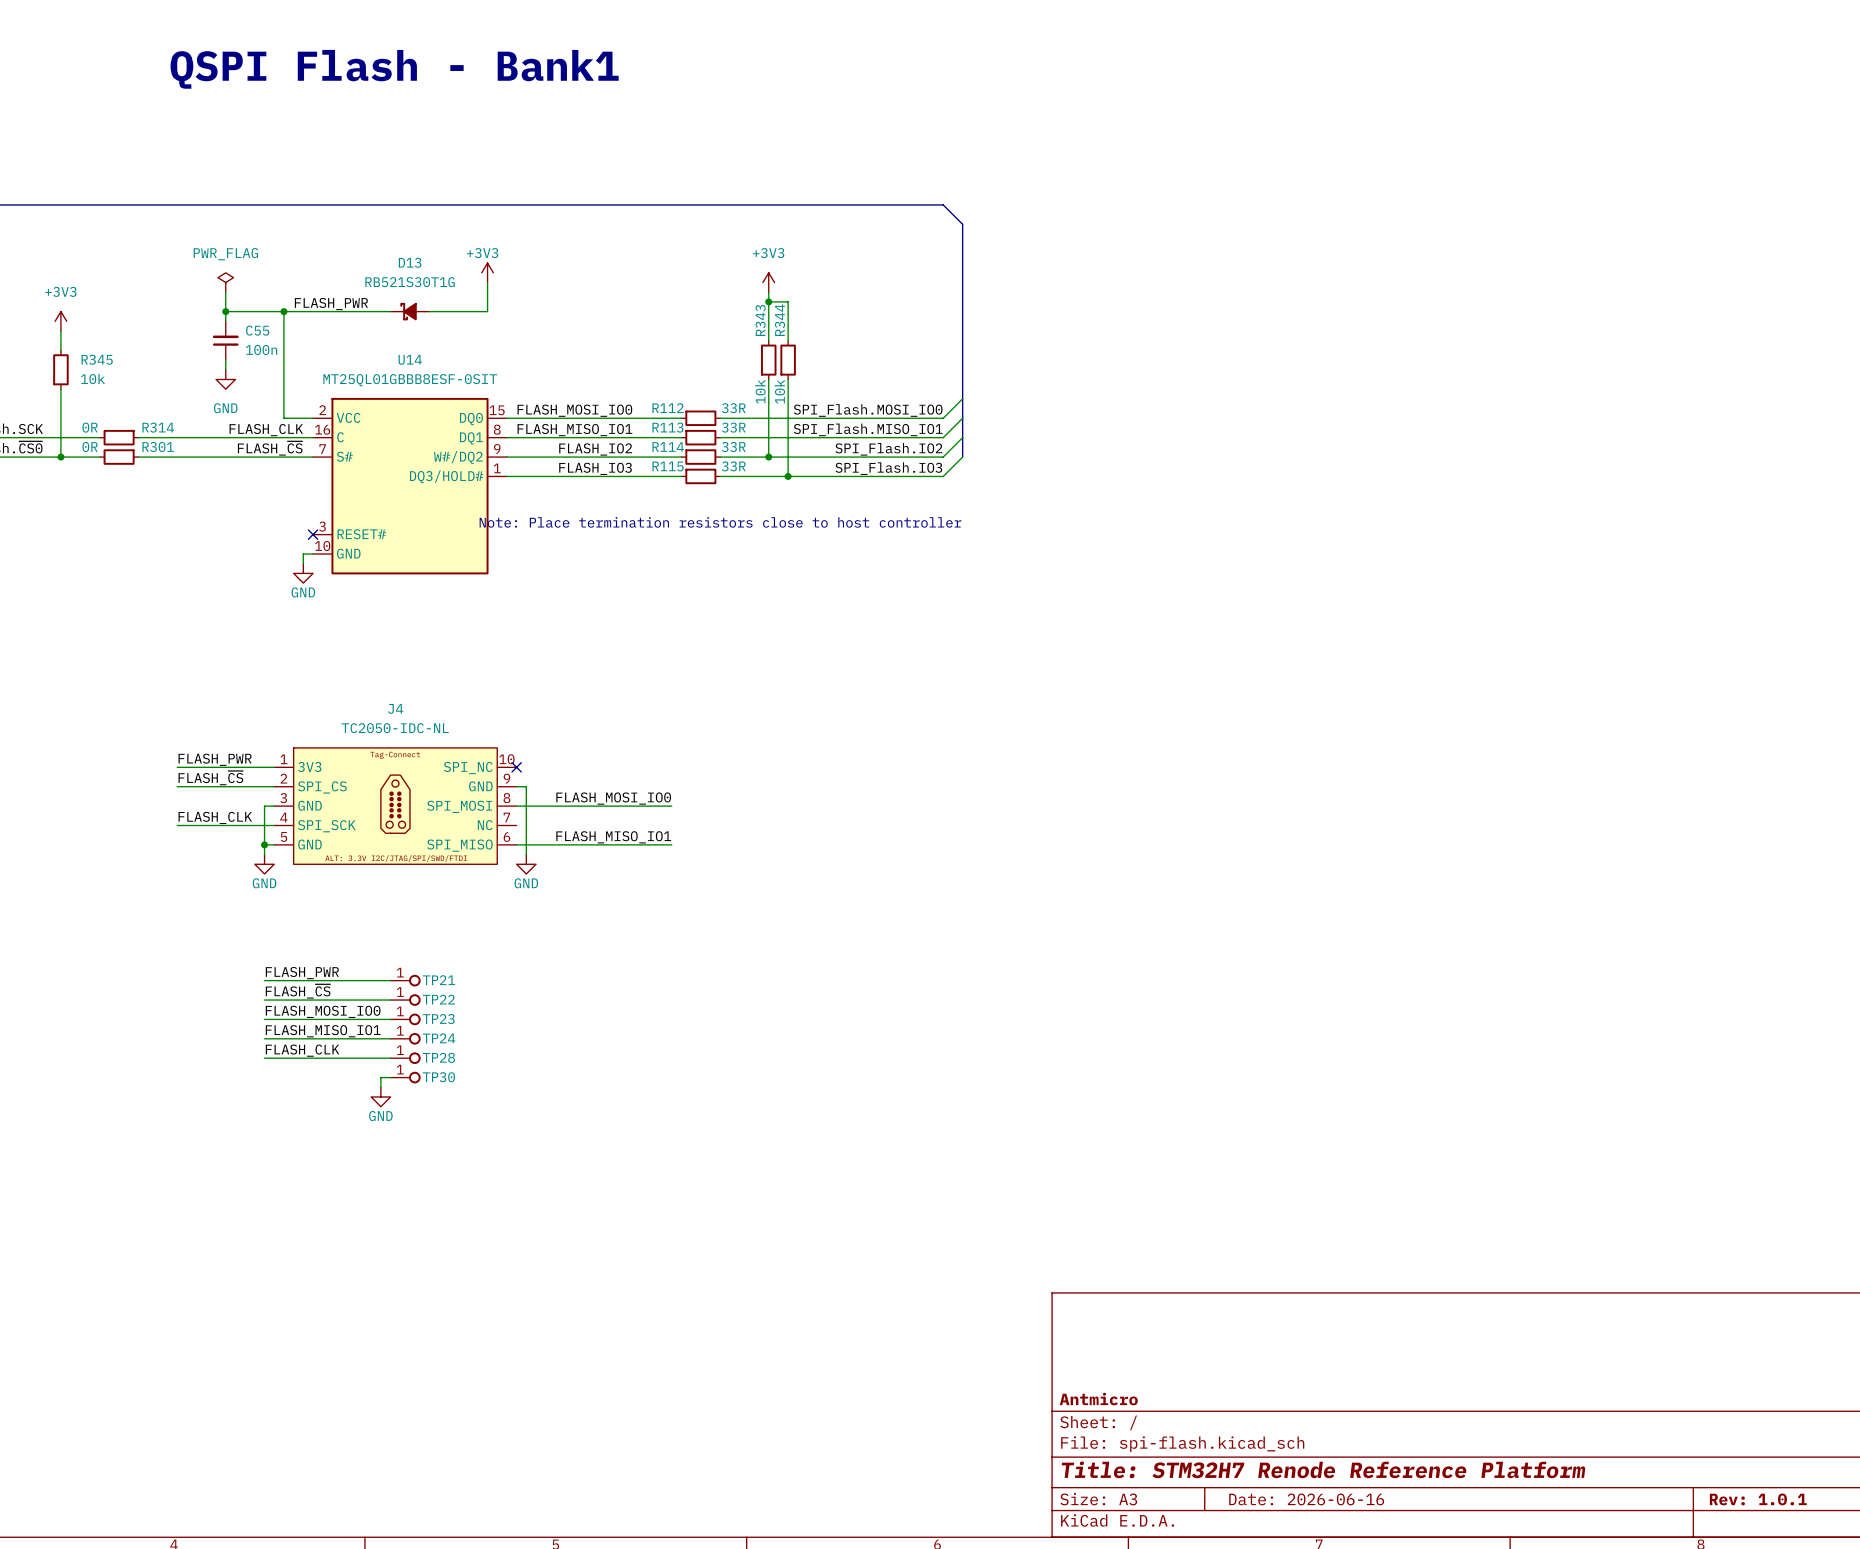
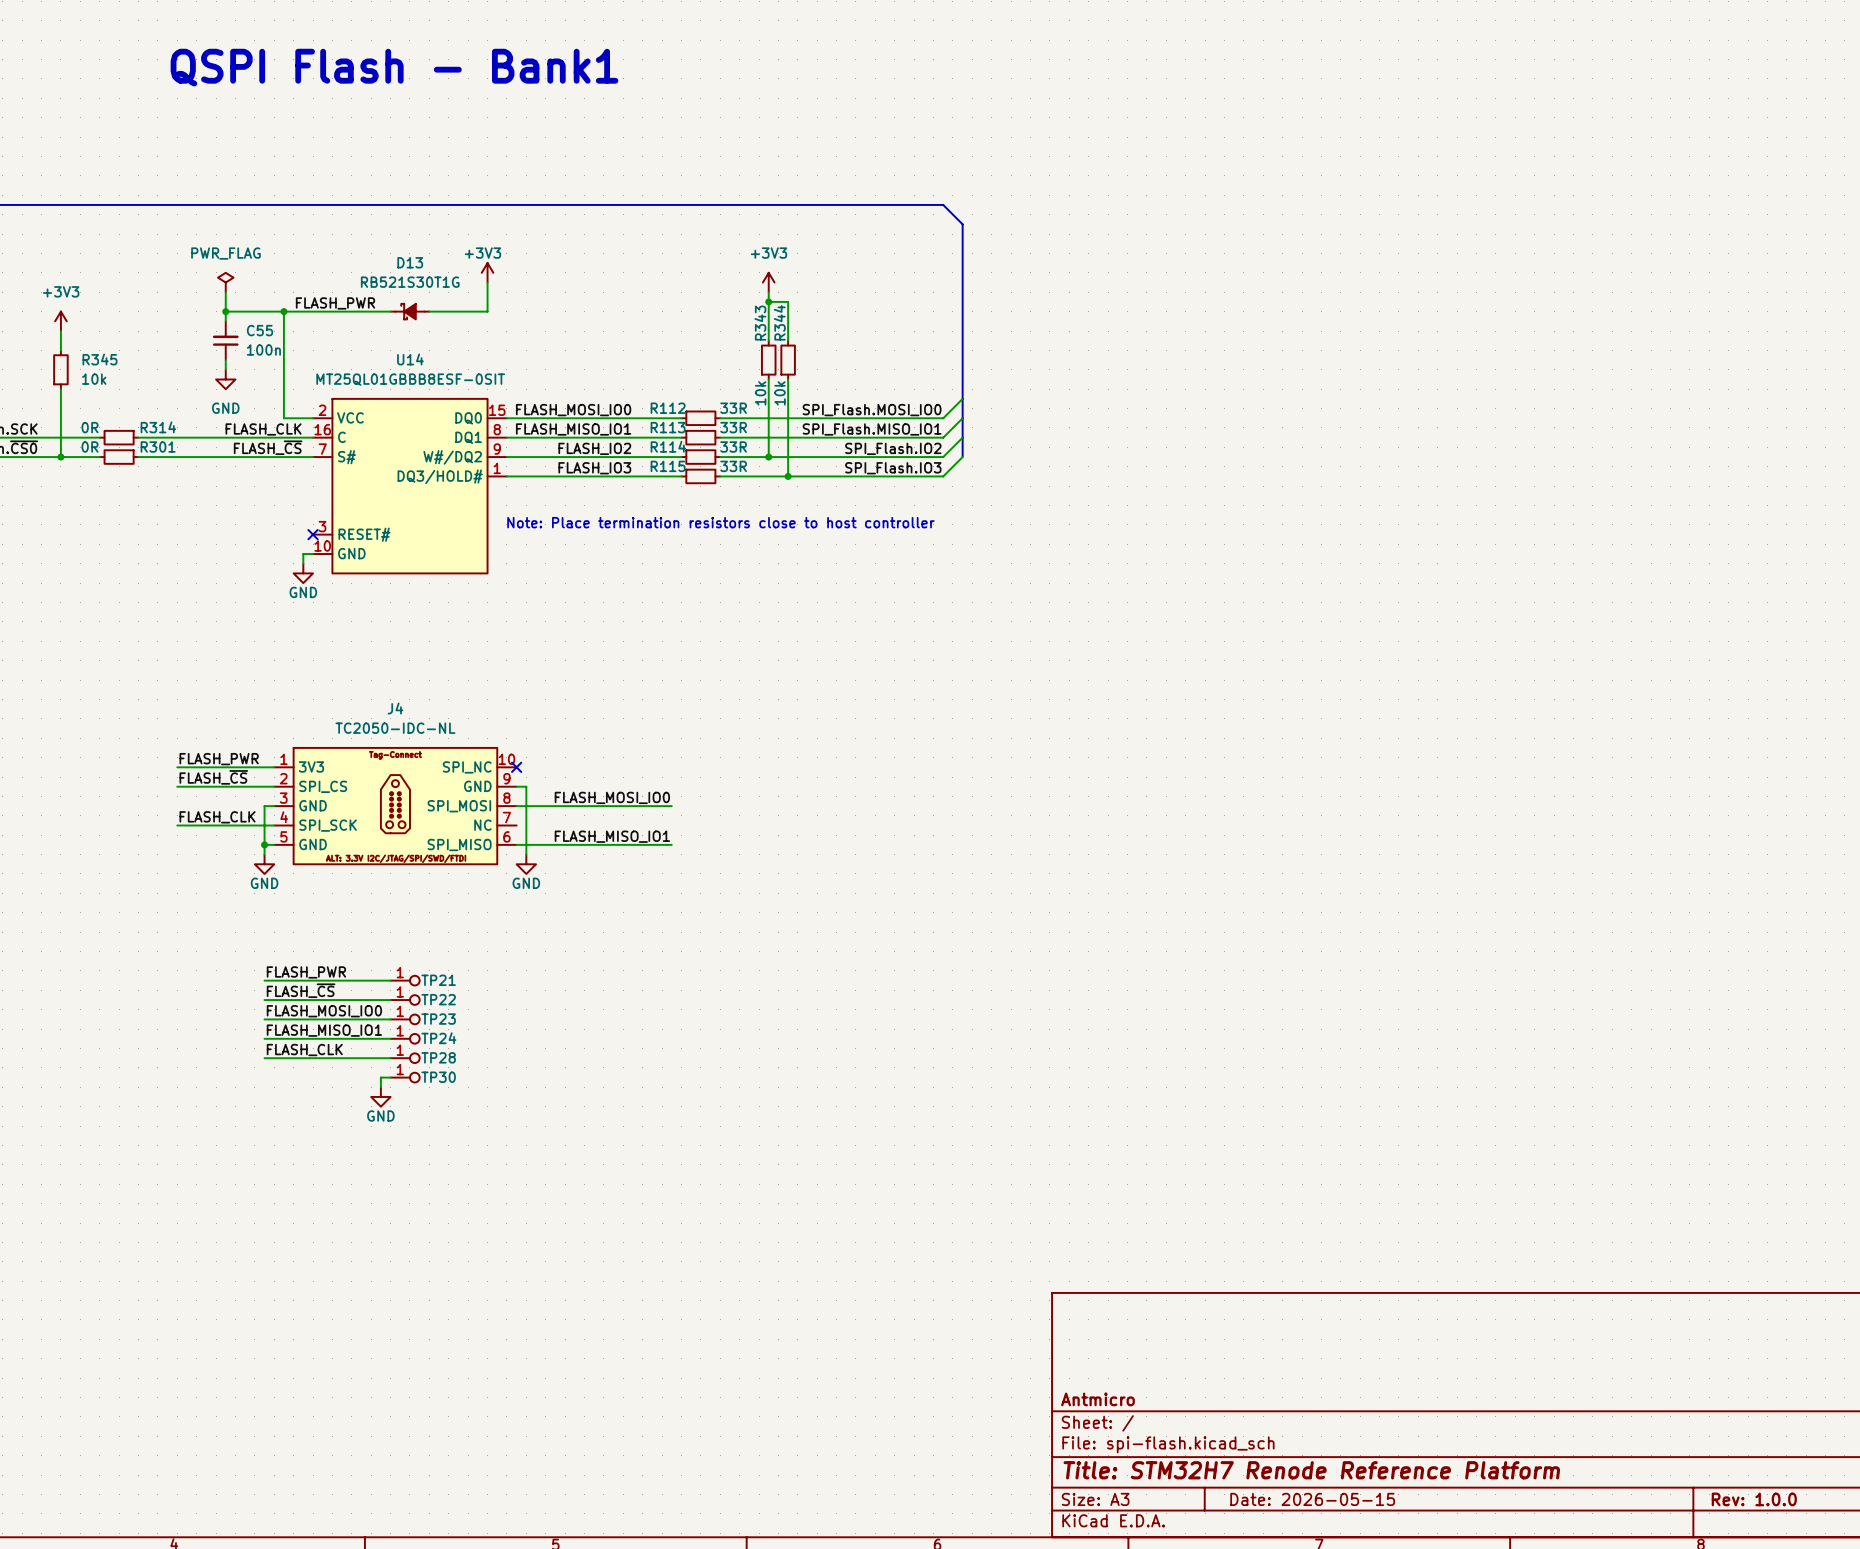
title block: Date: 2026-06-16 (1306, 1499) -> Date: 2026-05-15 (1312, 1499)
title block: Rev: 1.0.1 (1758, 1499) -> Rev: 1.0.0 (1754, 1499)

